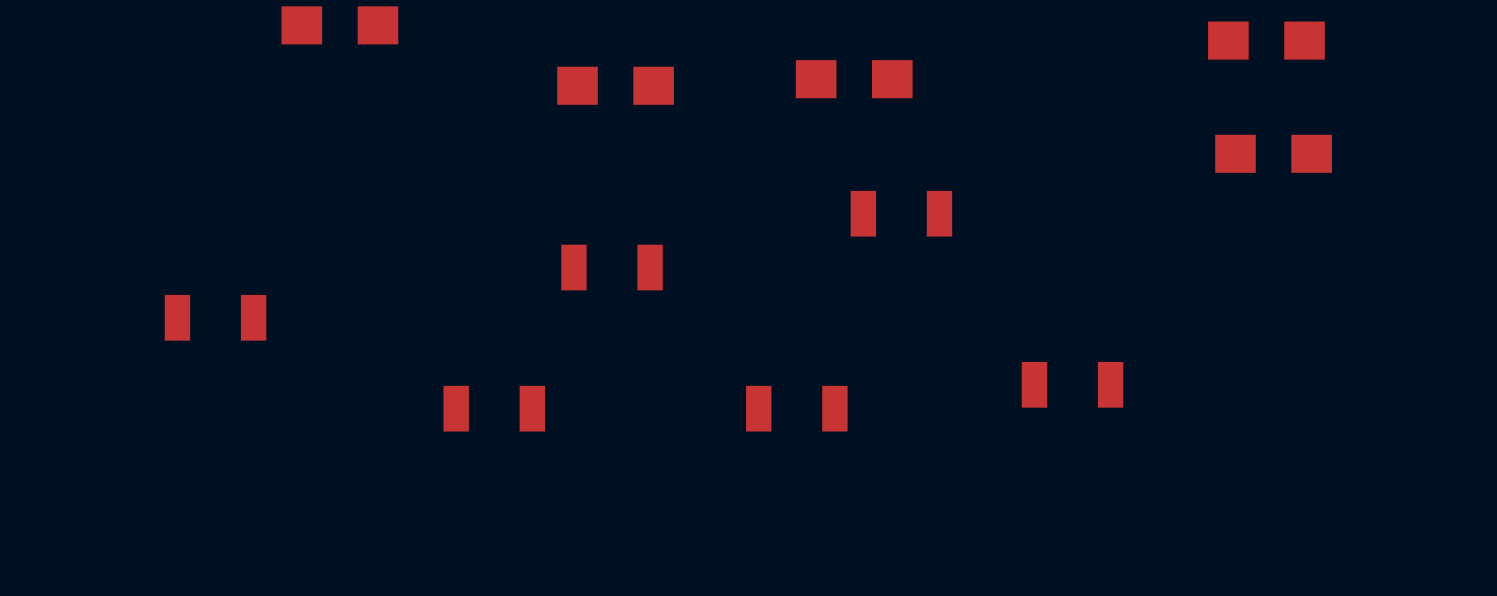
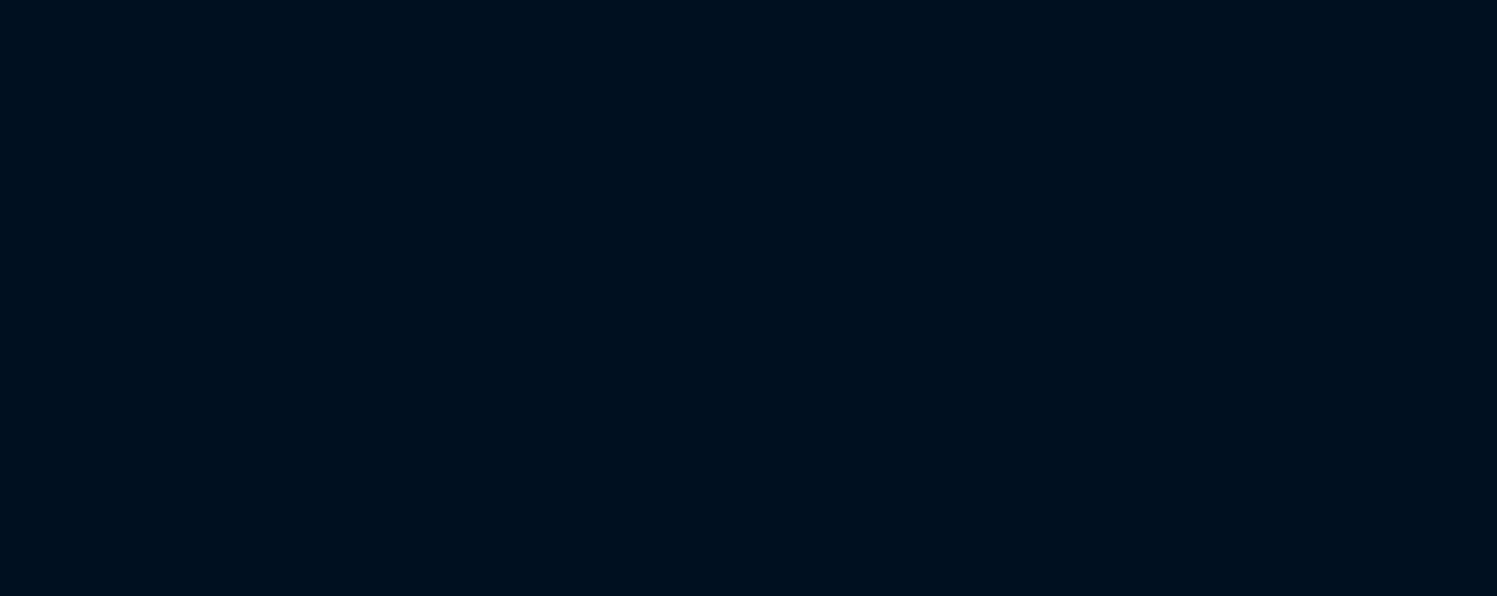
part: (339, 25) -> none
part: (1266, 40) -> none
part: (854, 79) -> none
part: (615, 85) -> none
part: (1273, 153) -> none
part: (901, 213) -> none
part: (612, 267) -> none
part: (215, 317) -> none
part: (1072, 384) -> none
part: (494, 408) -> none
part: (796, 408) -> none

